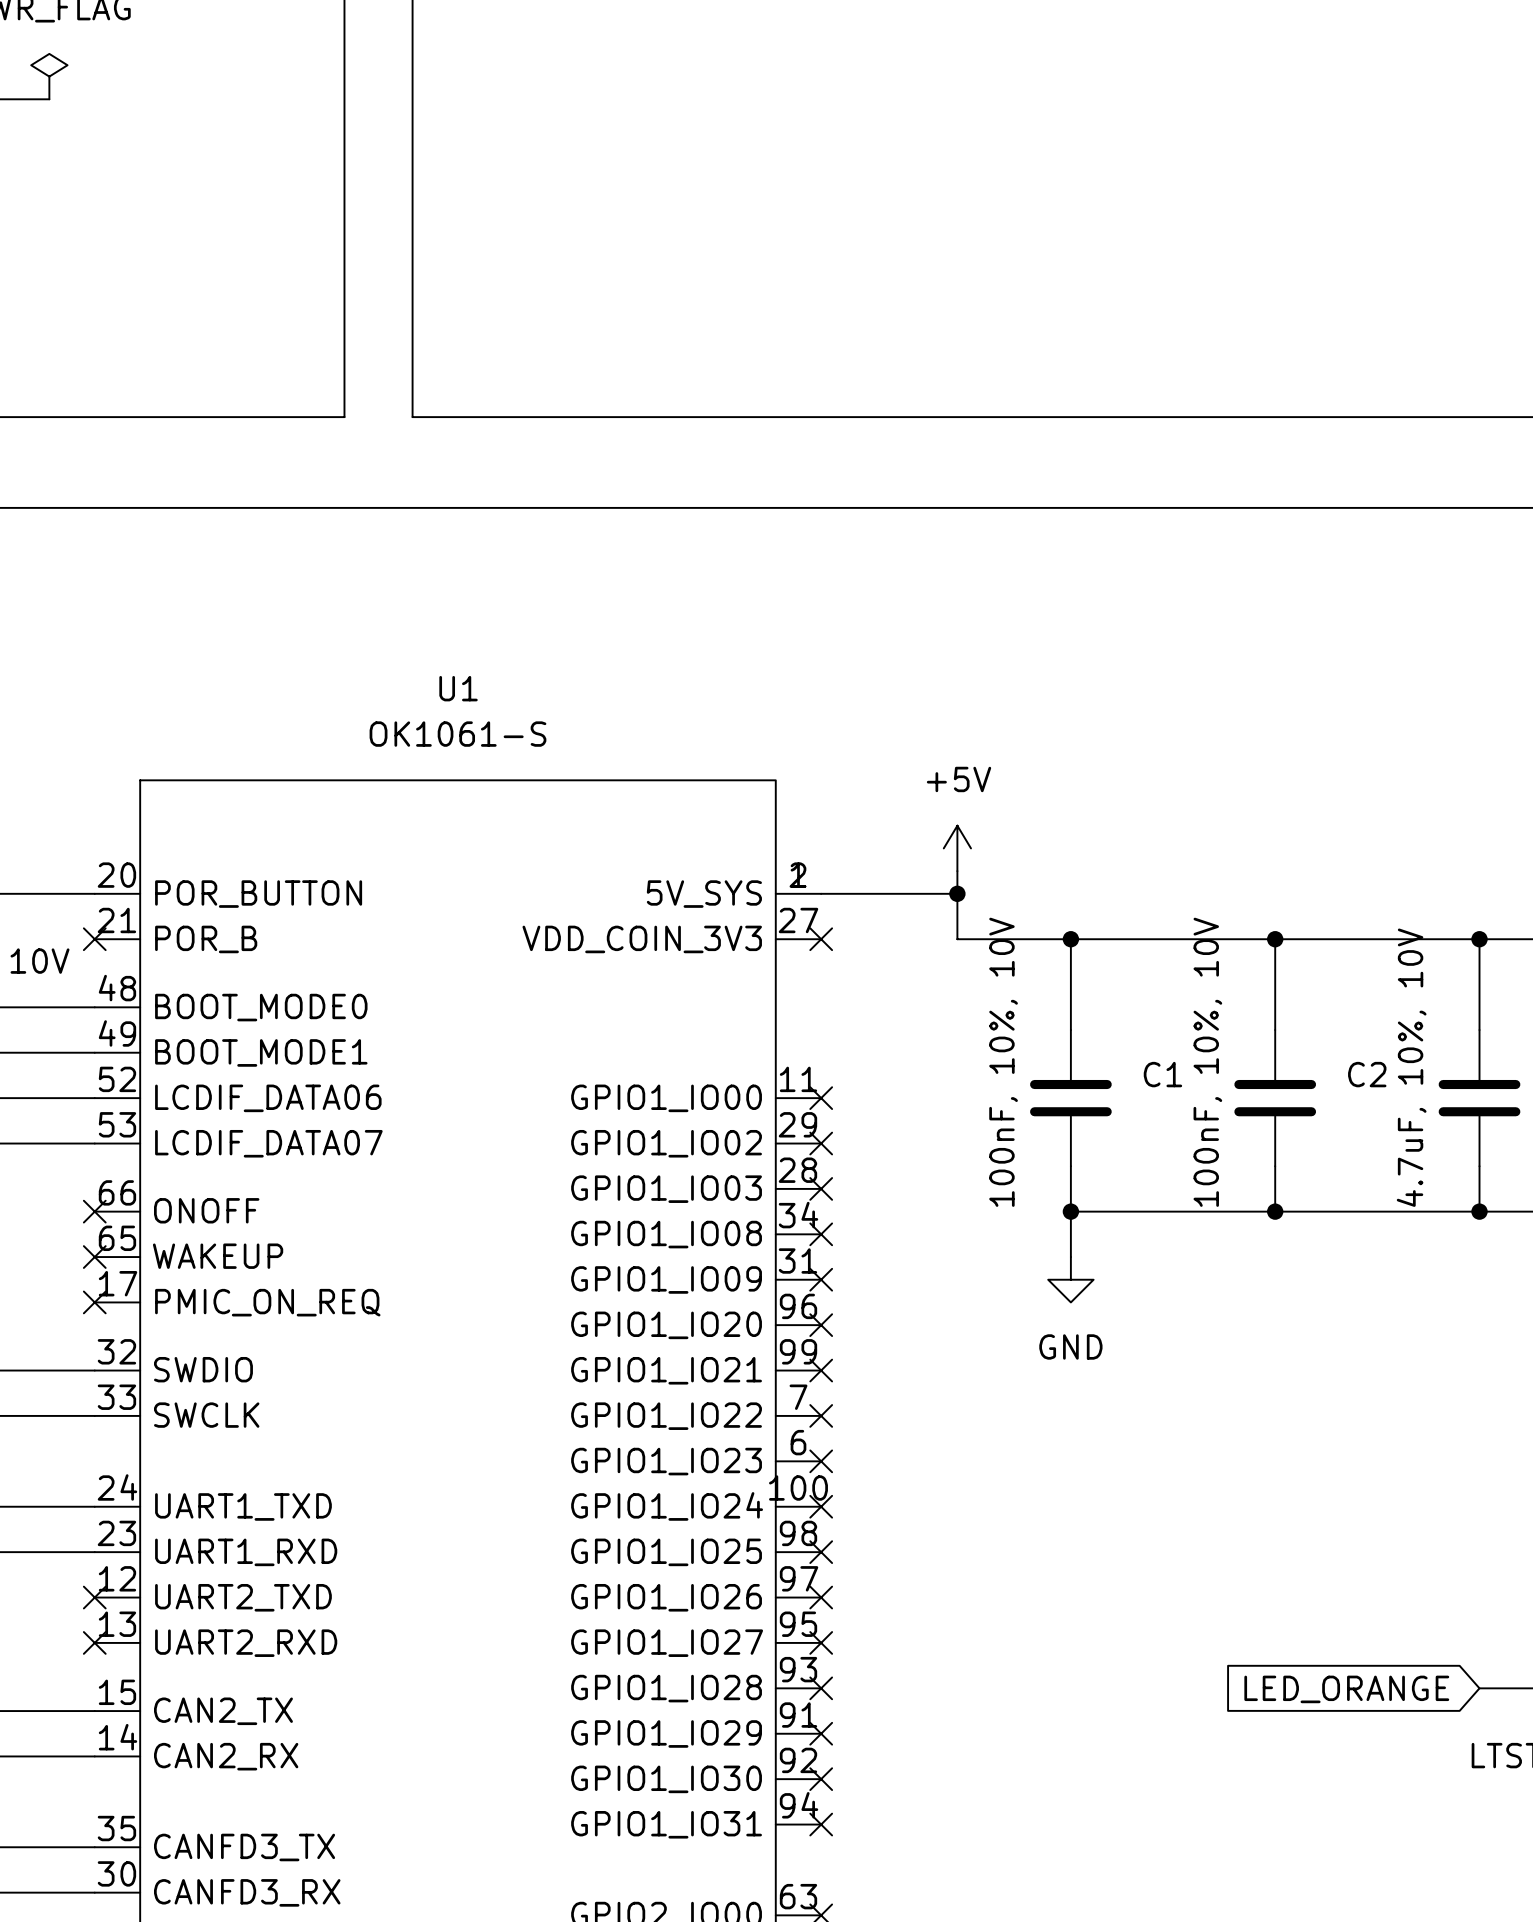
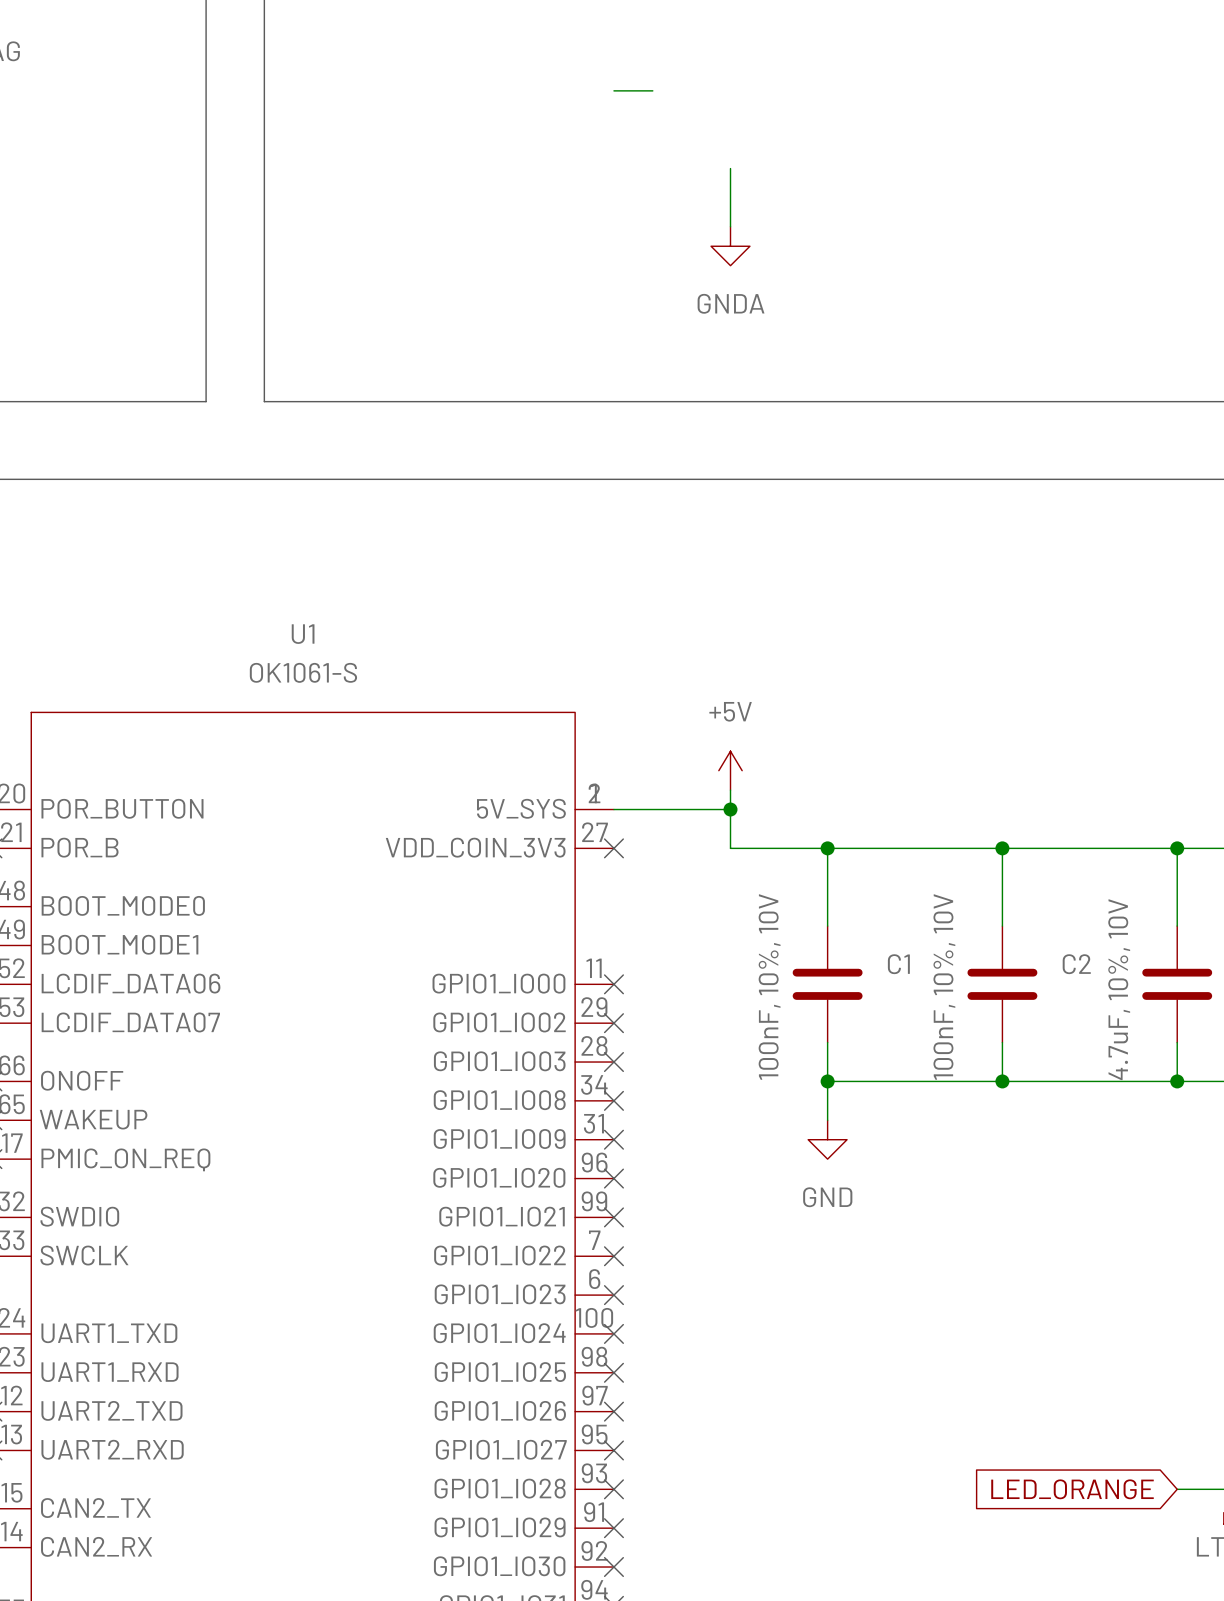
wire: none -> (613, 90) (652, 90)
wire: none -> (730, 168) (730, 226)
power symbol: none -> GNDA (730, 246)

